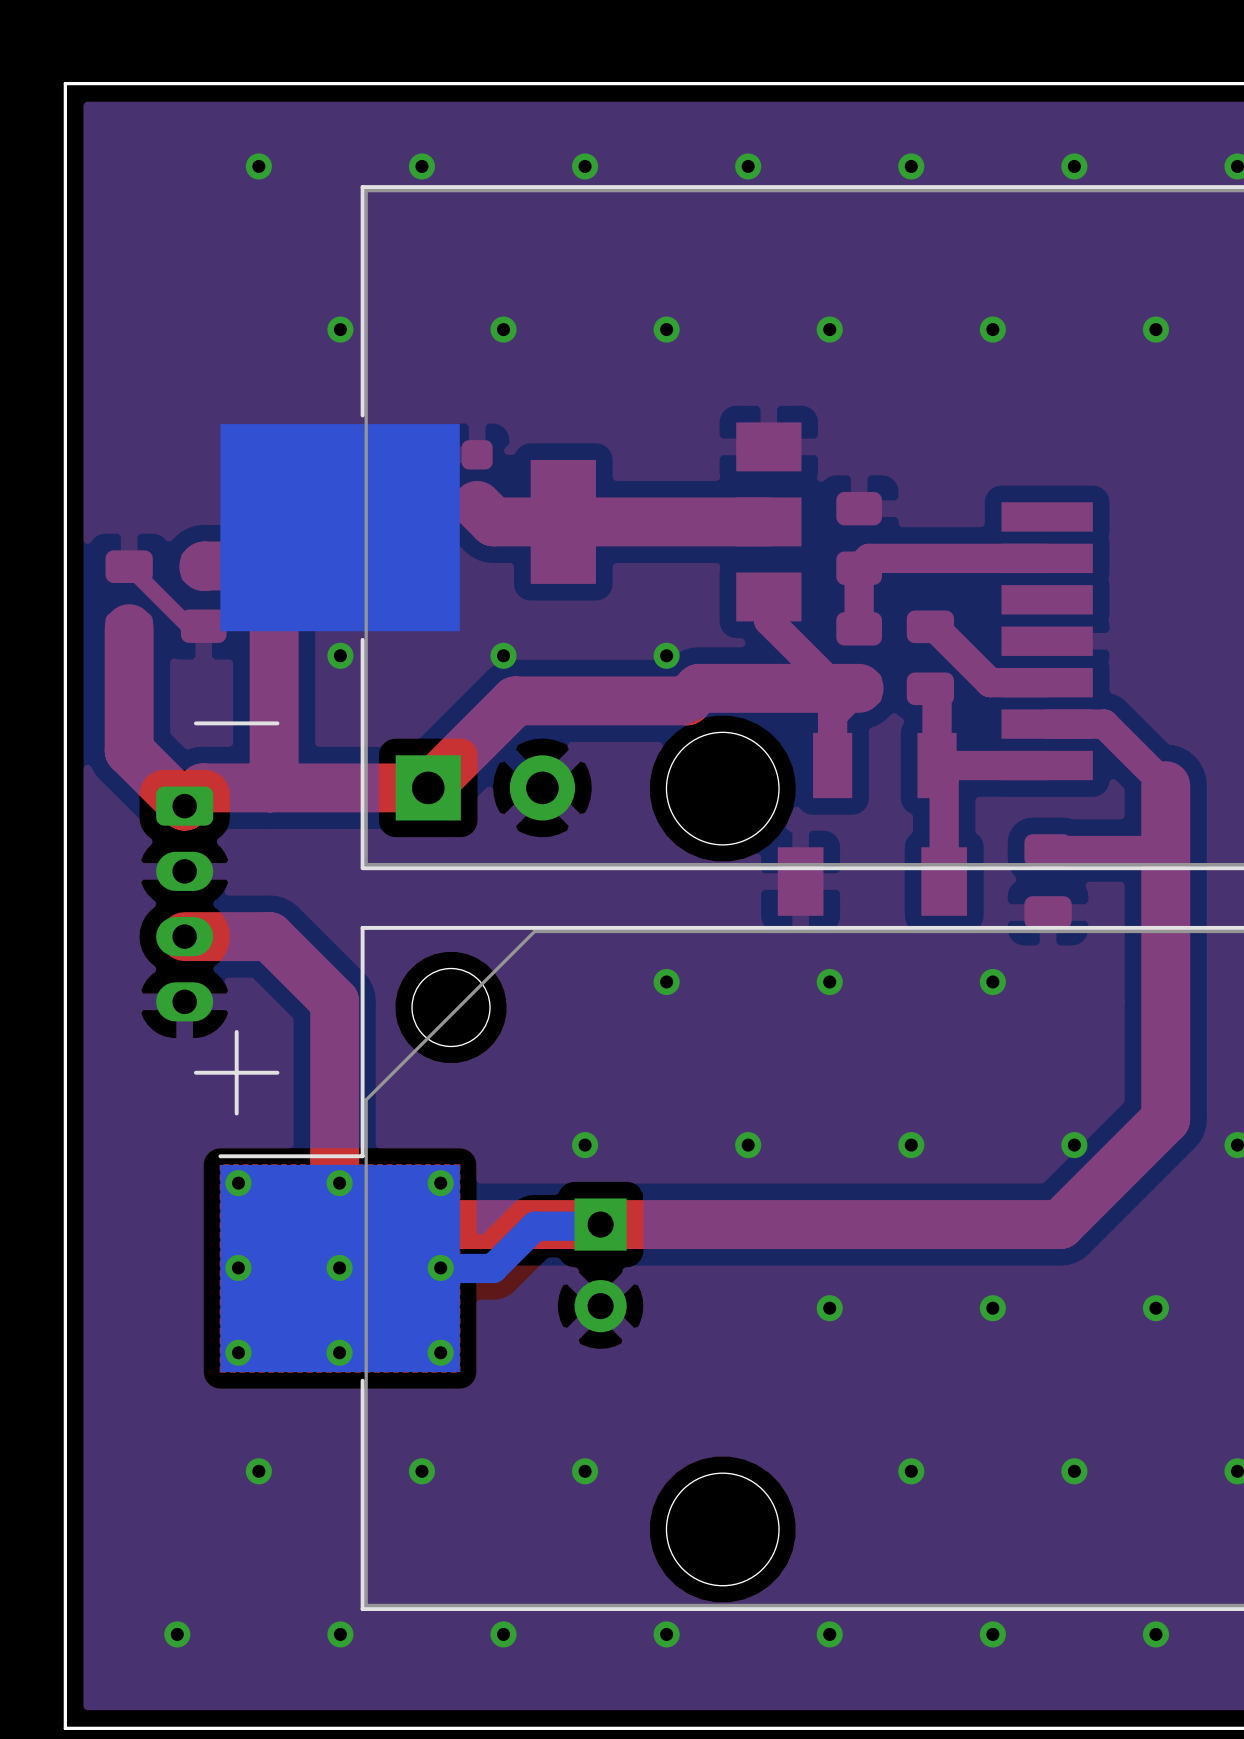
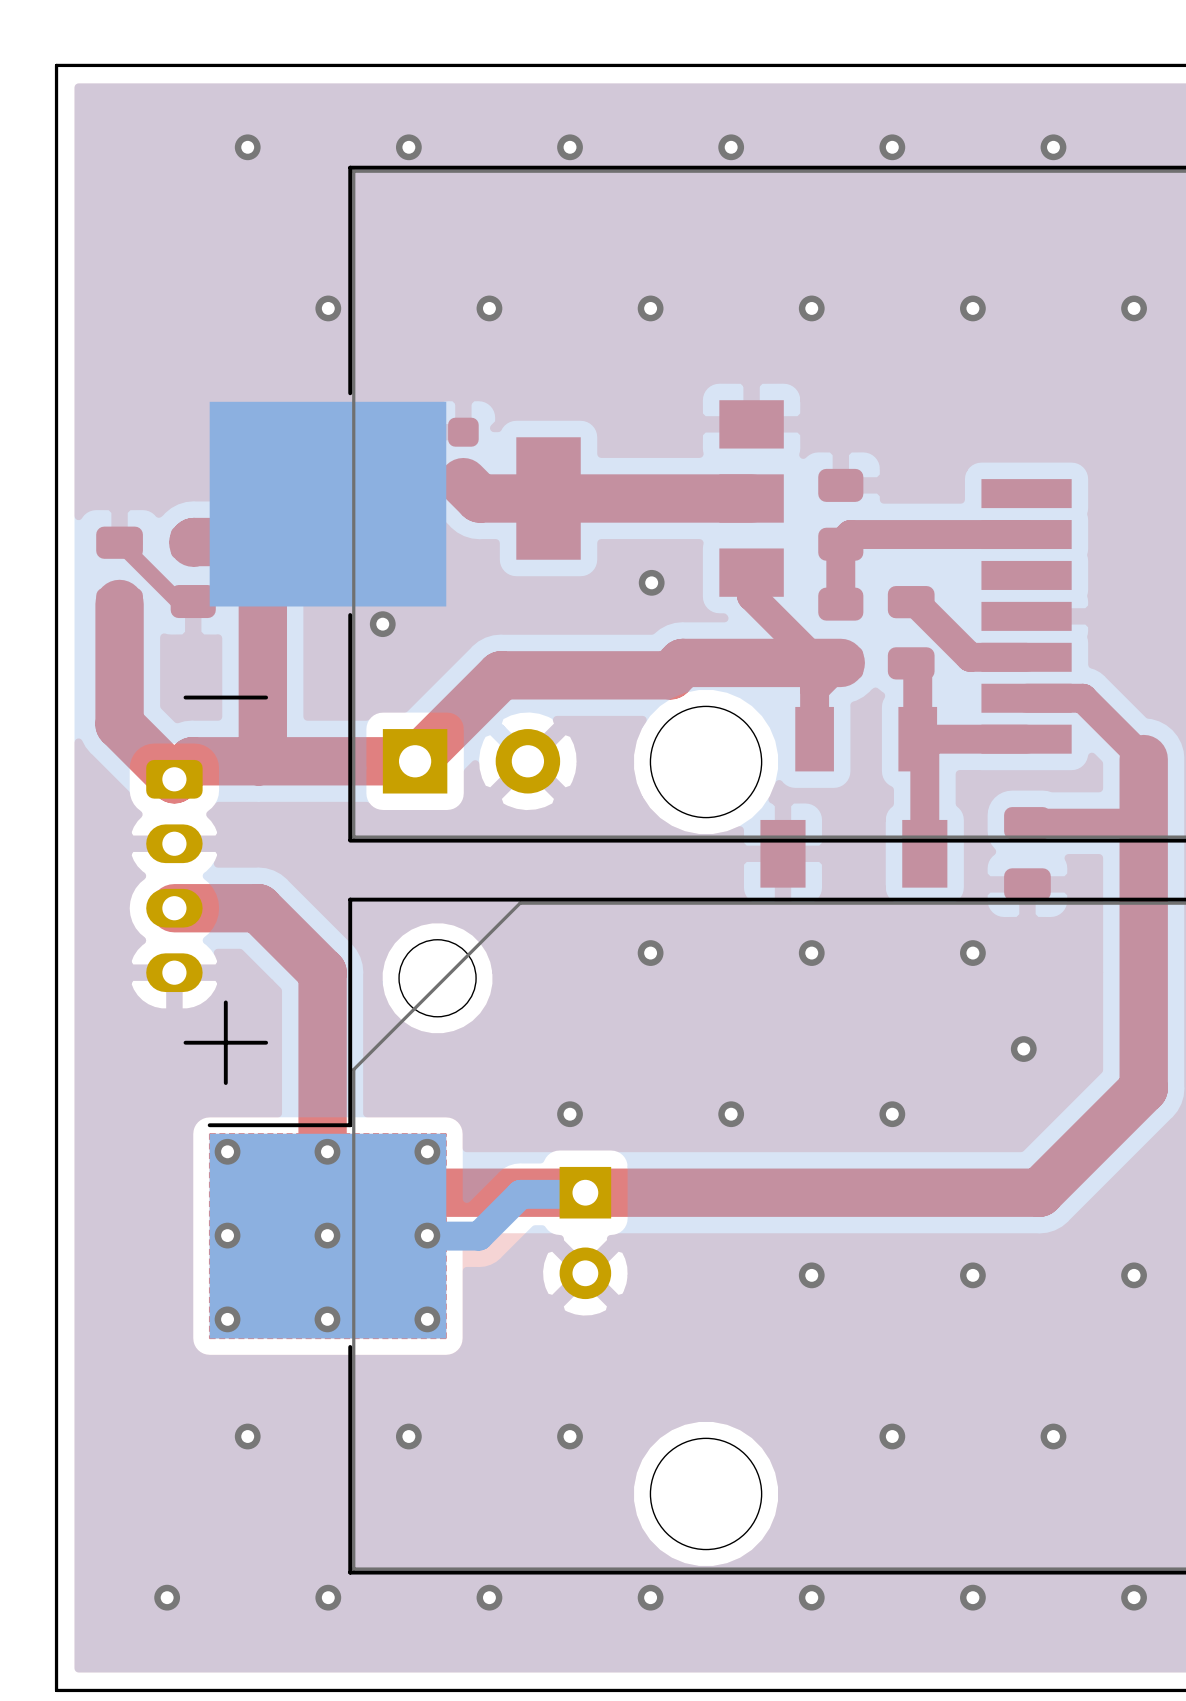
via: none -> (382, 624)
via: (340, 655) -> none
via: (503, 655) -> none
via position: (666, 655) -> (651, 582)
via position: (1074, 1145) -> (1023, 1049)

